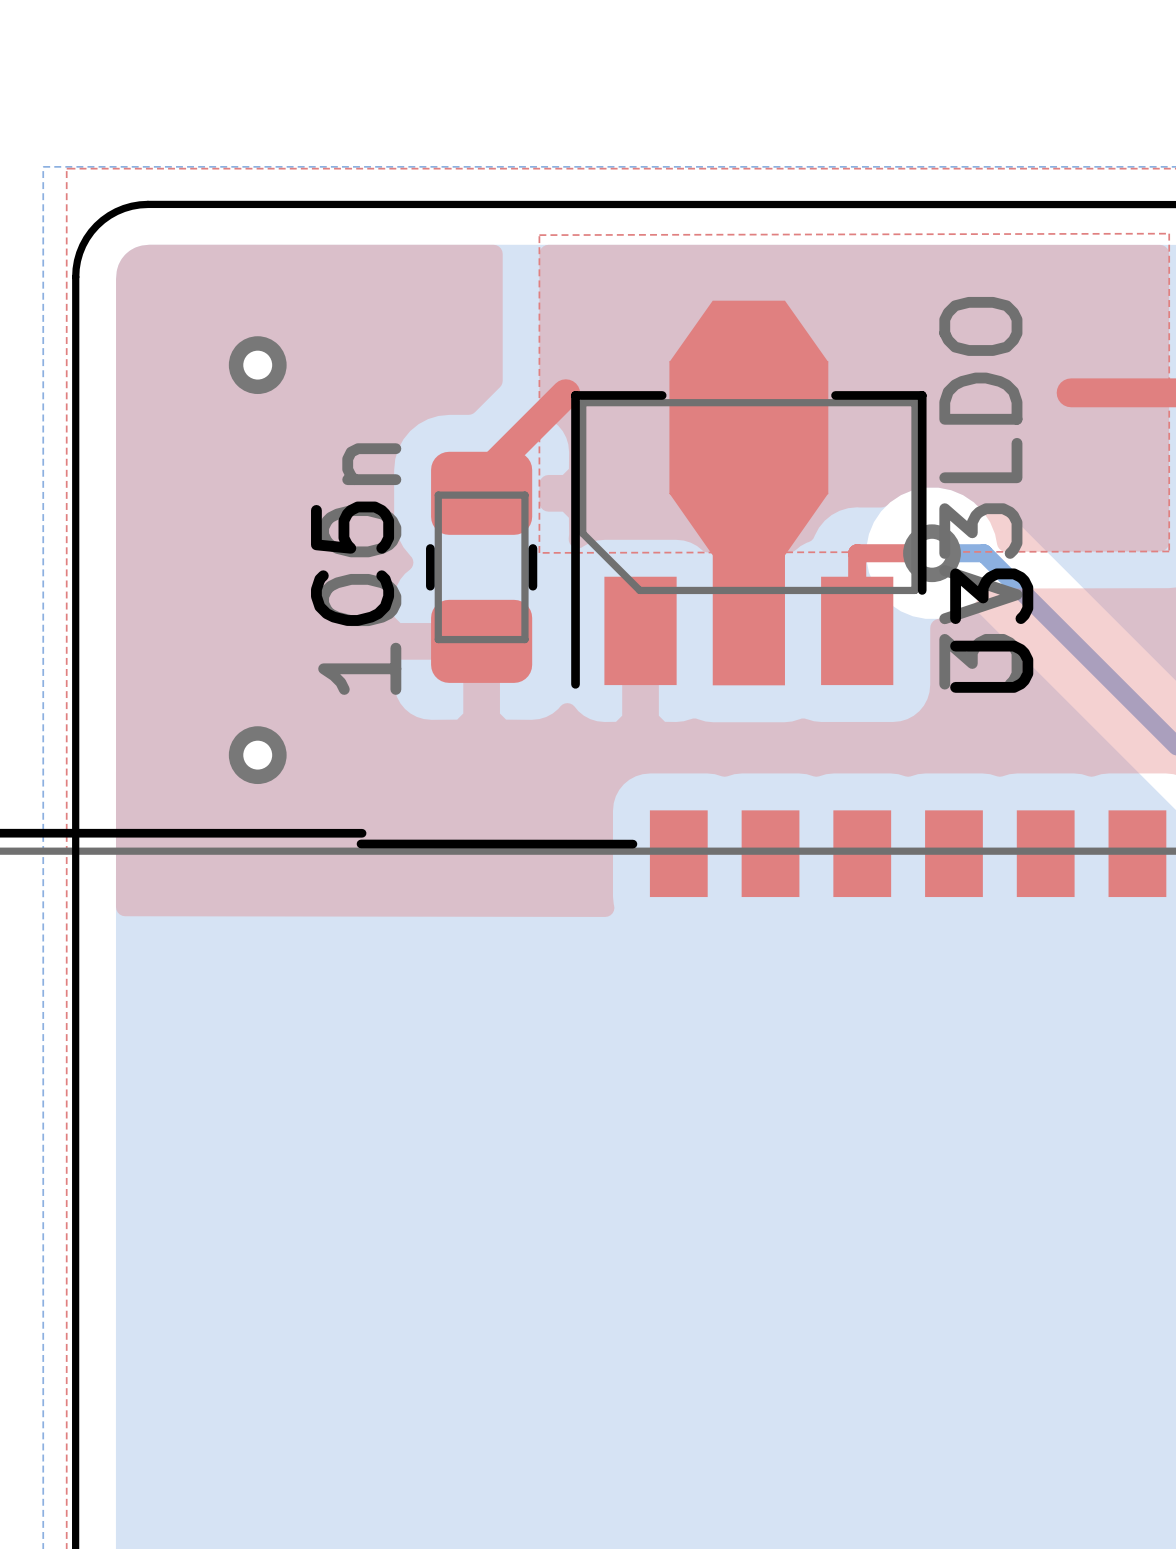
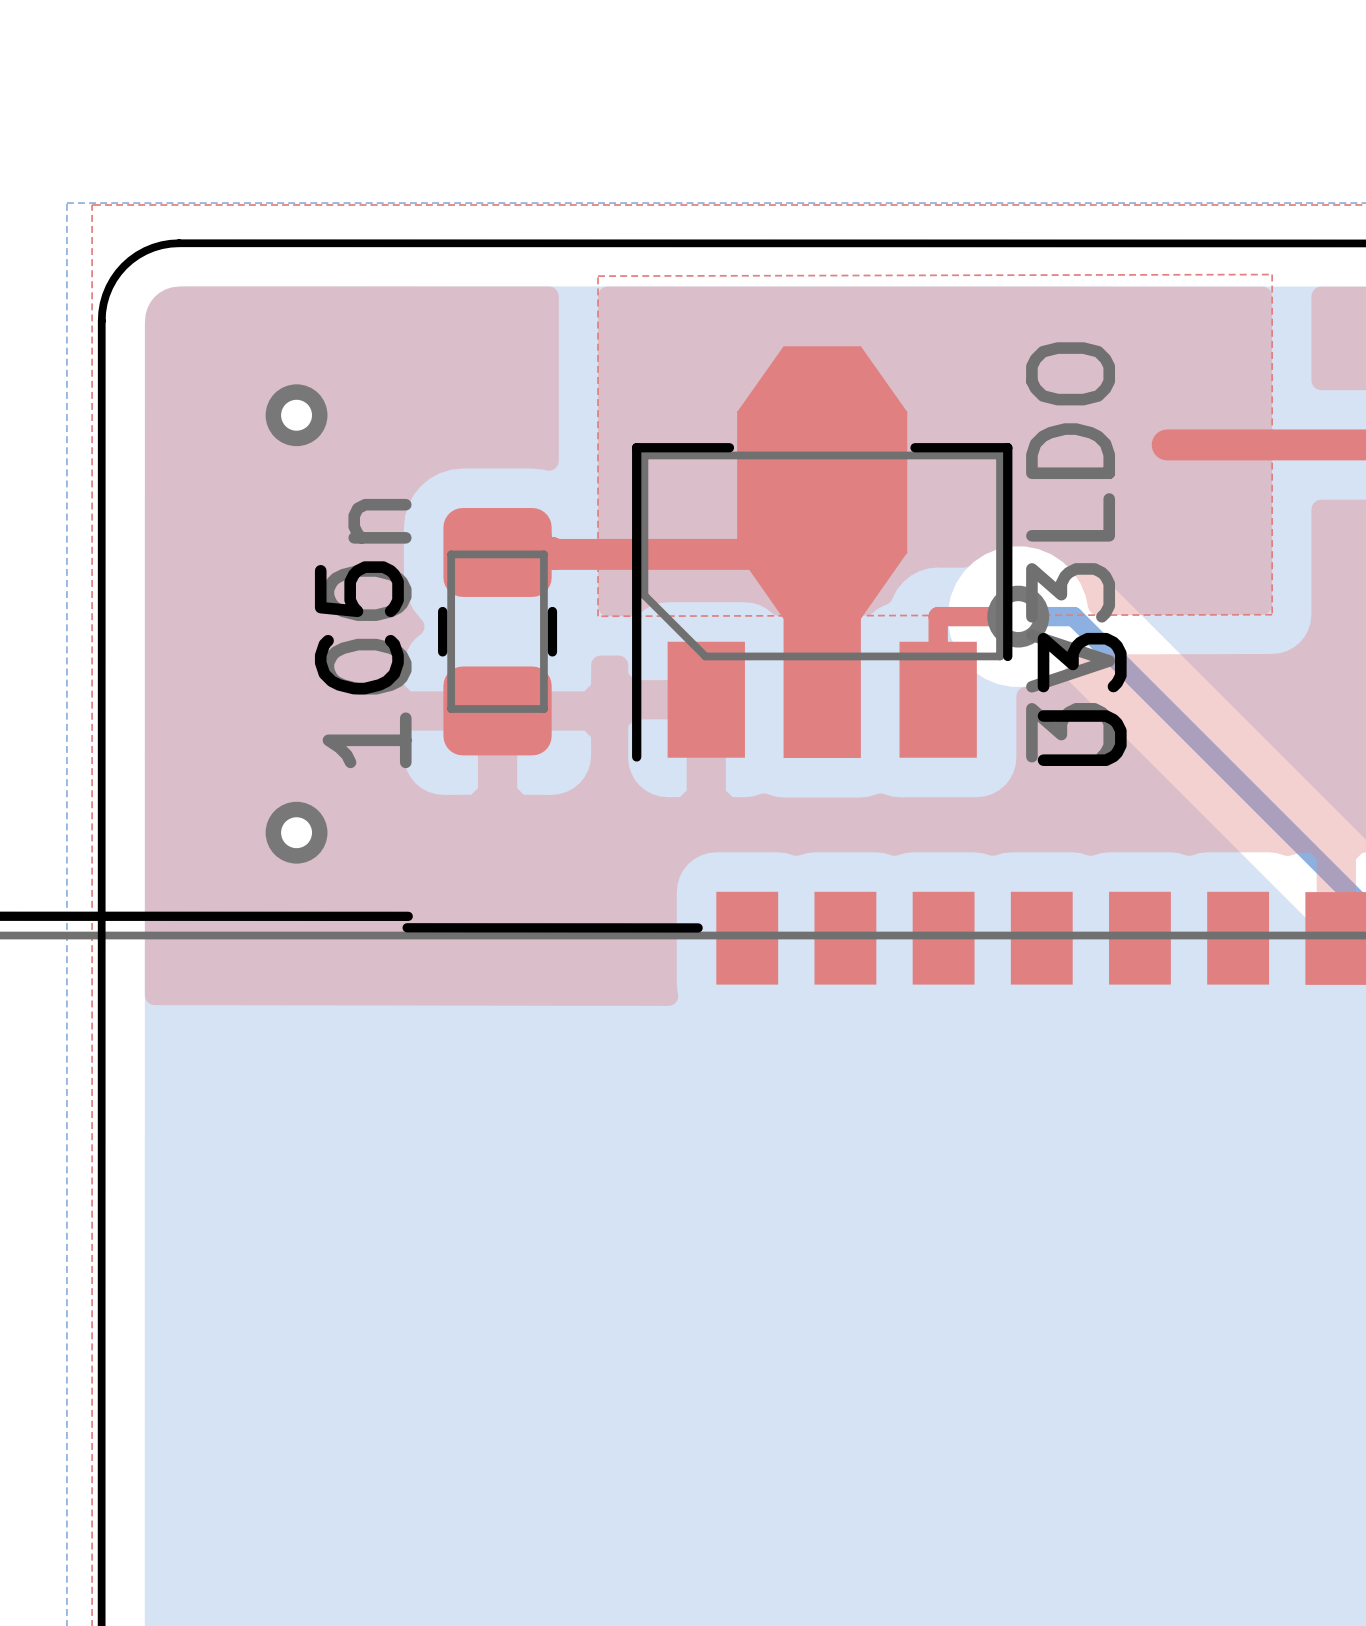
top track: (565, 393) (481, 477) -> none
top track: none -> (822, 492) (760, 554) (553, 554) (551, 552) (497, 552)
C5 position: (481, 567) -> (497, 631)

